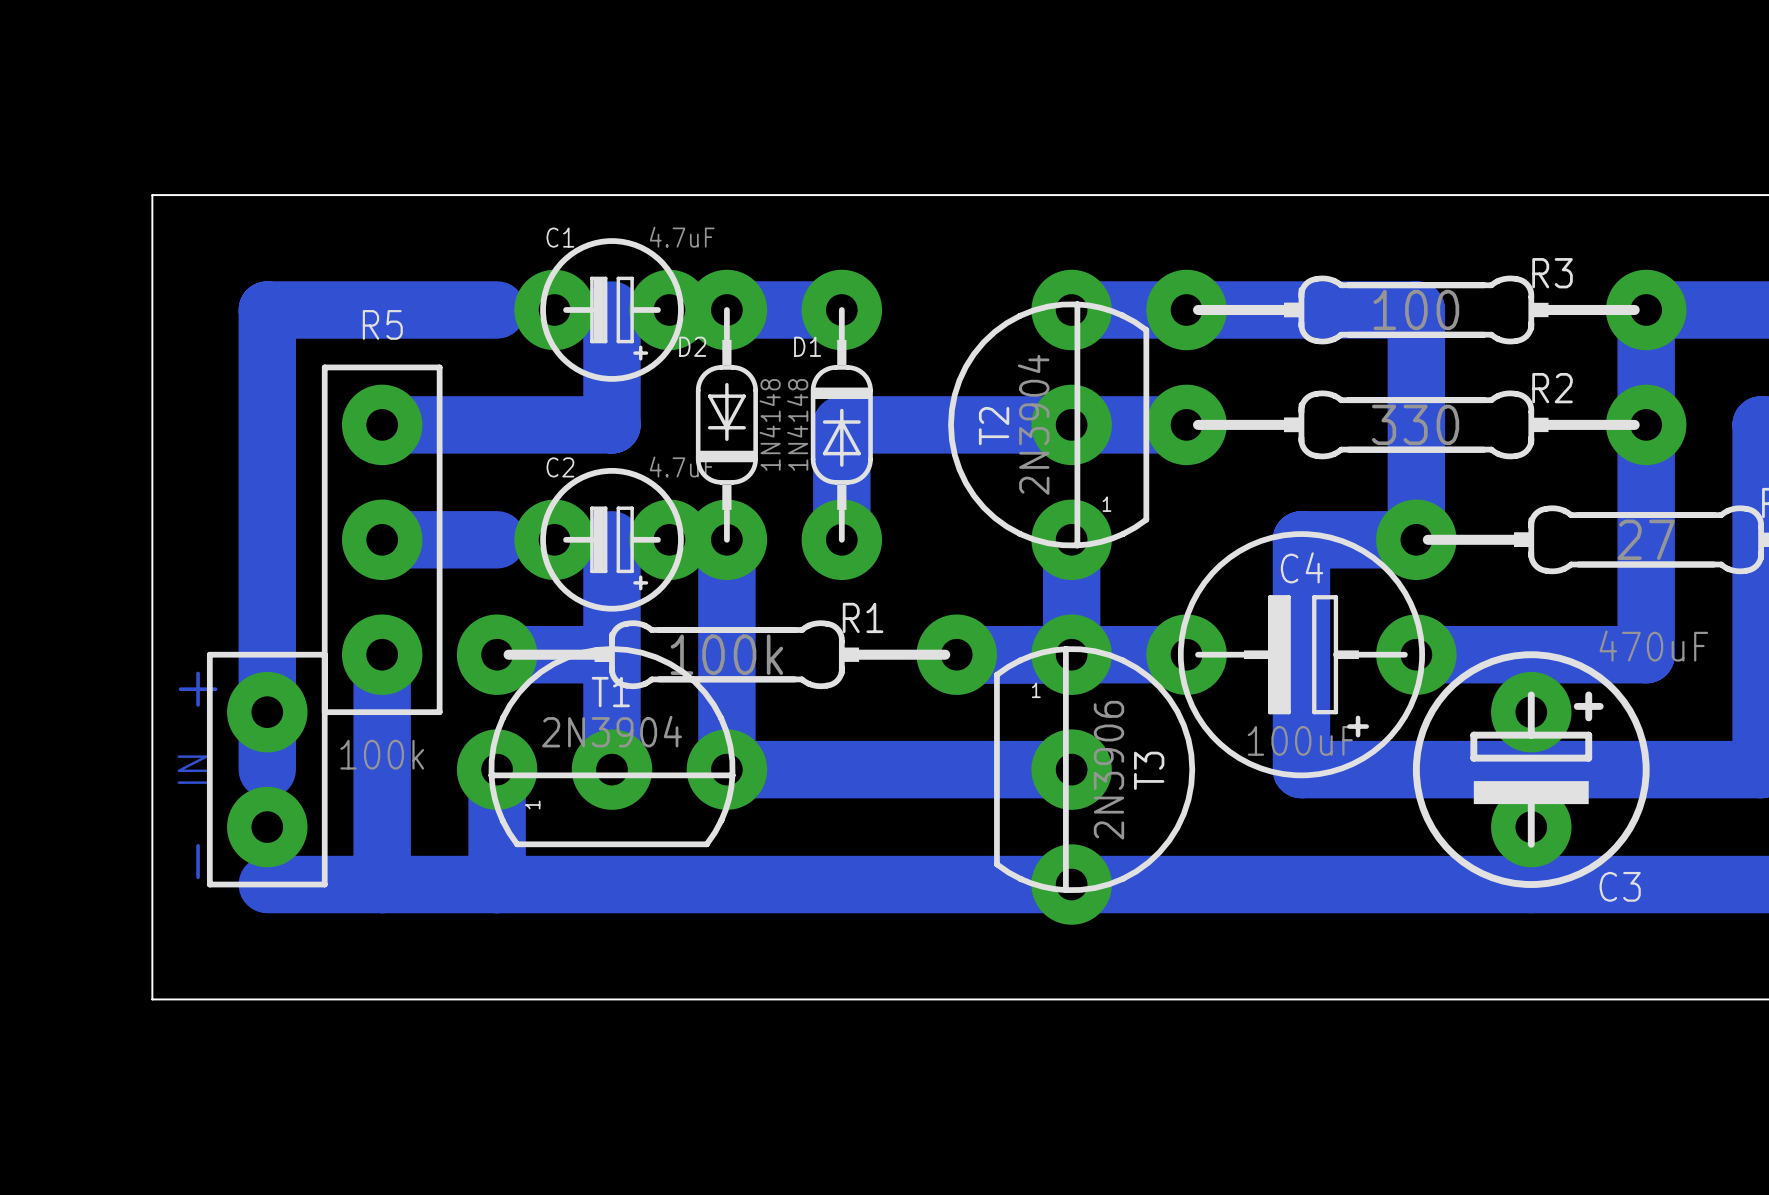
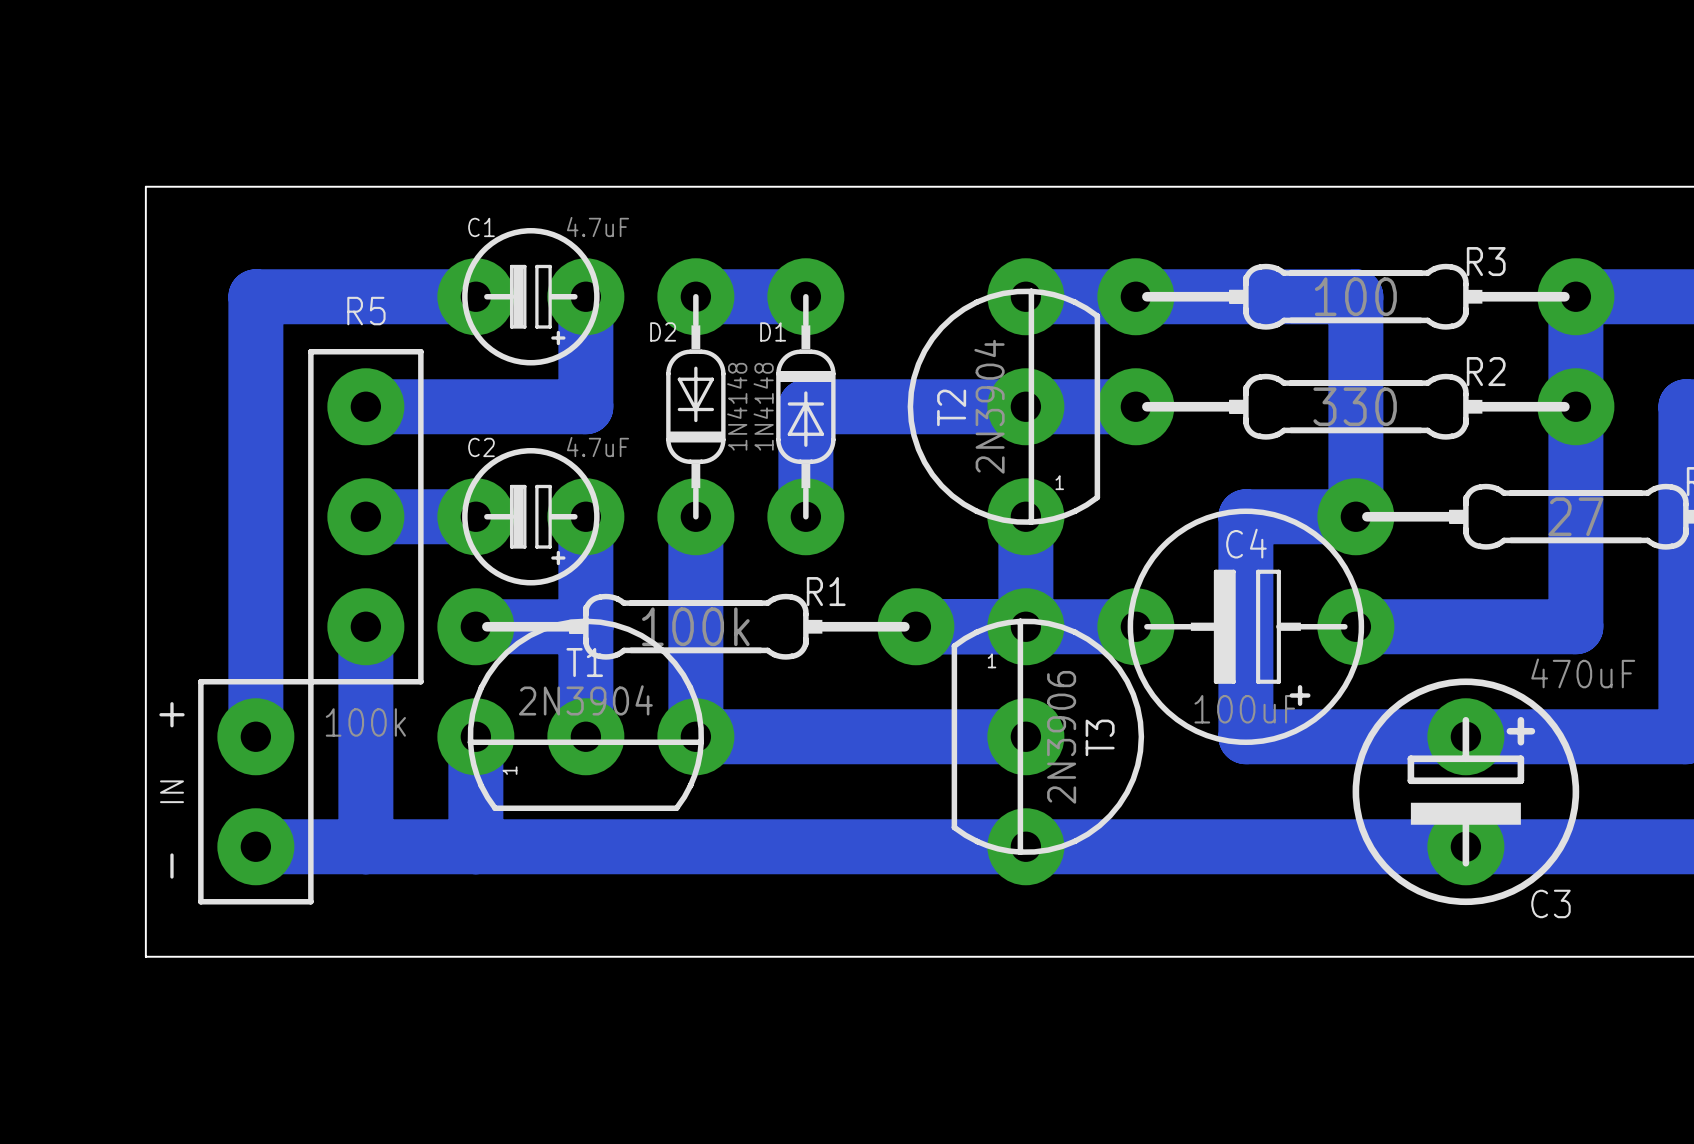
C1 position: (612, 309) -> (530, 296)
C2 position: (612, 539) -> (530, 516)
IN: (267, 769) -> none
C3 position: (1531, 769) -> (1465, 791)
IN: none -> (236, 791)

